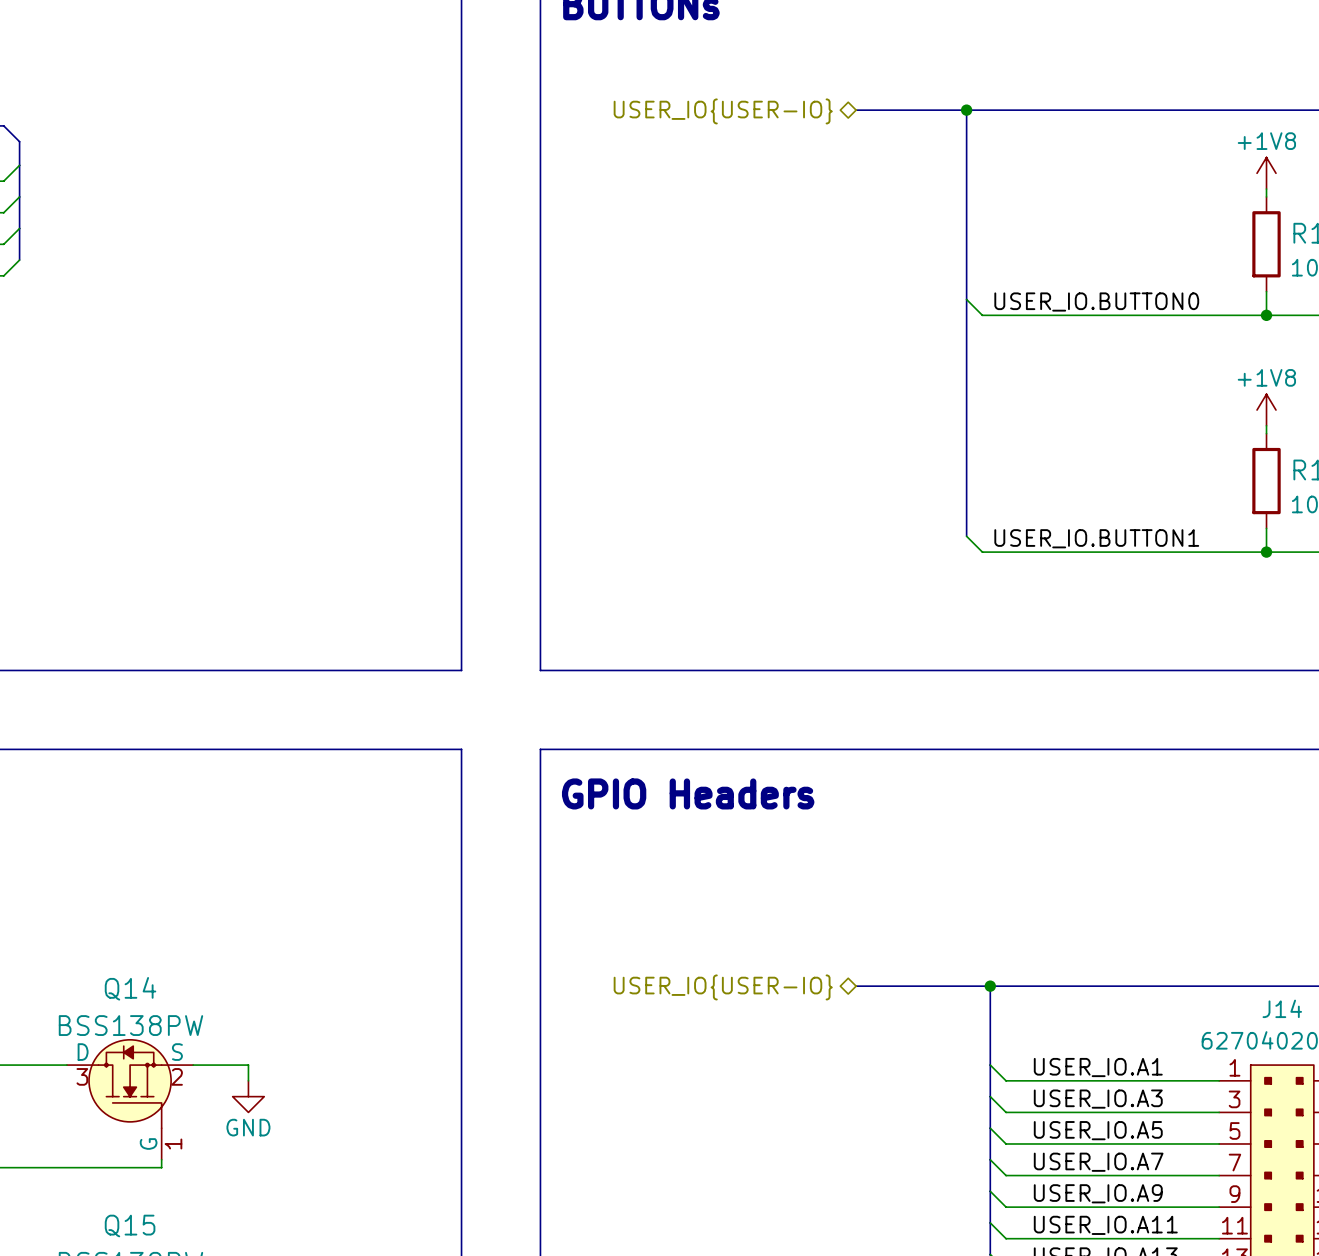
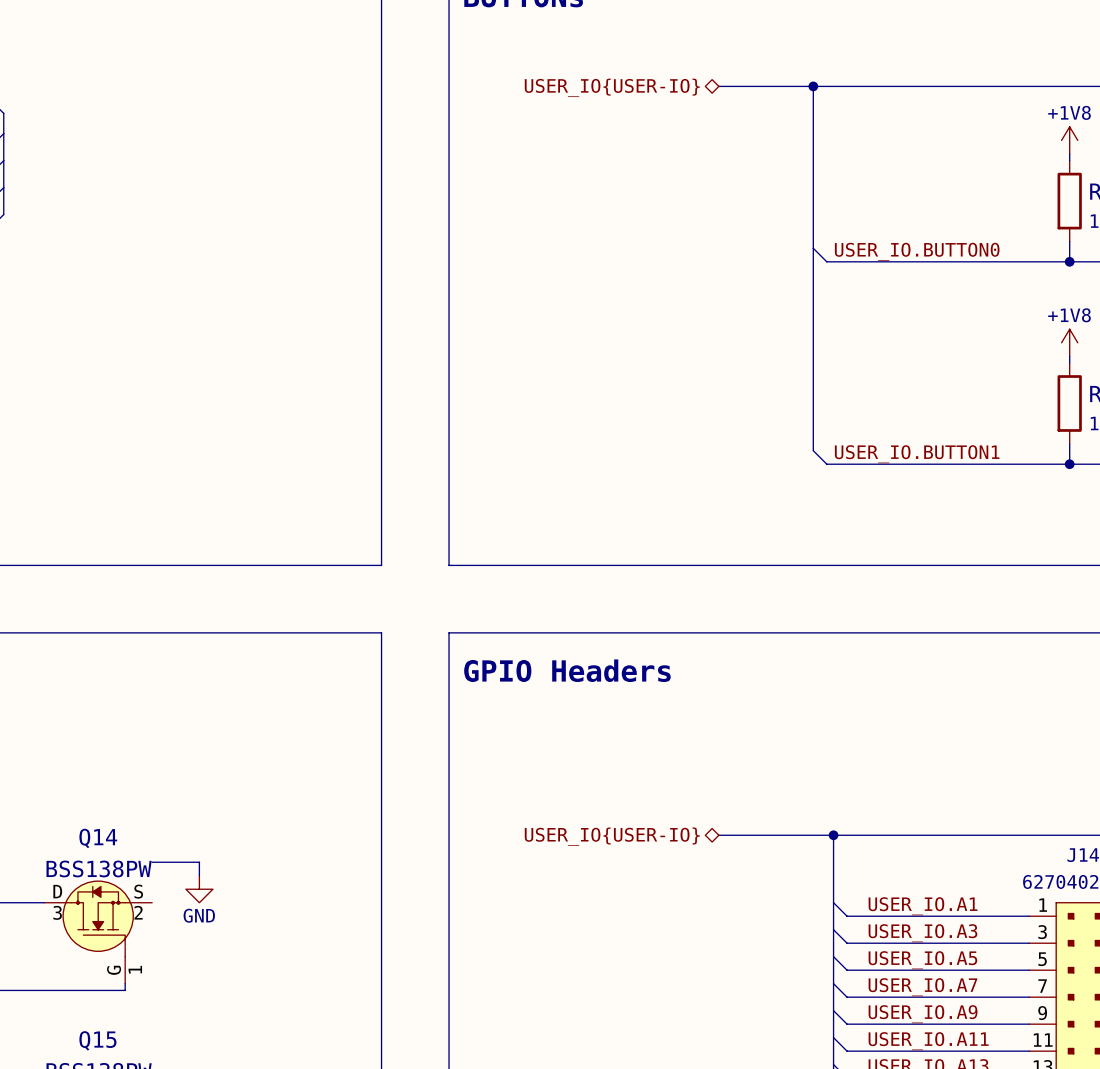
wire: (193, 1065) (248, 1065) (248, 1080) -> (152, 862) (199, 862) (199, 875)
power symbol position: GND (248, 1096) -> GND (199, 889)

